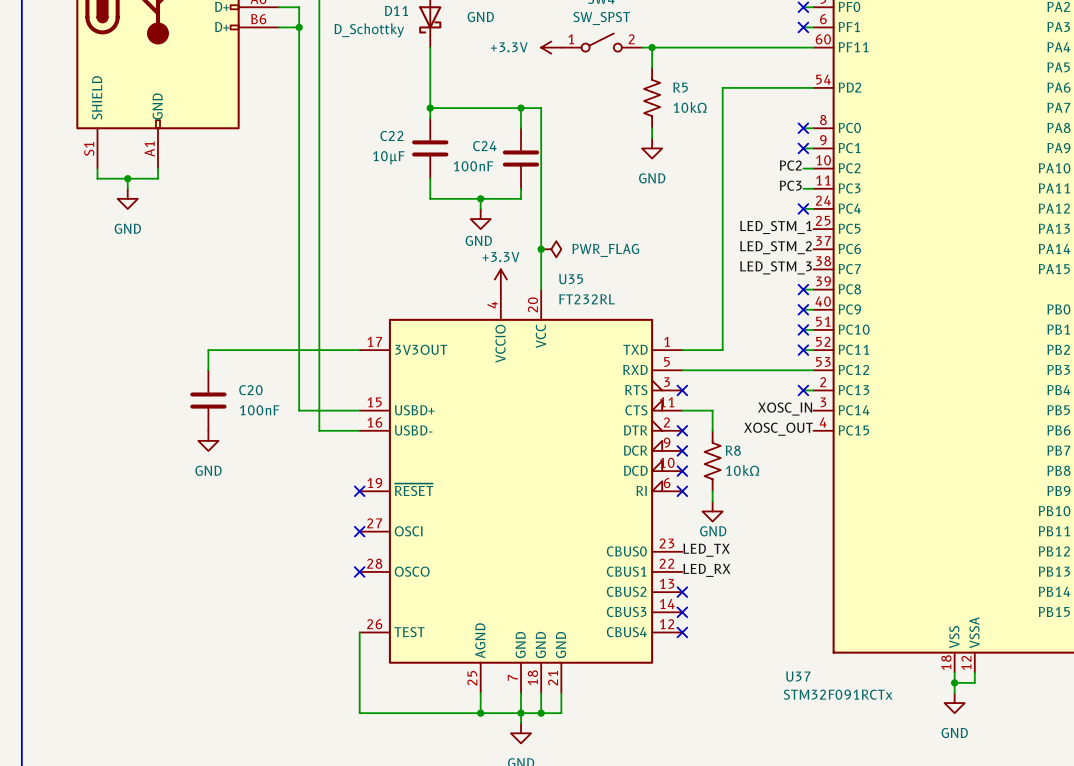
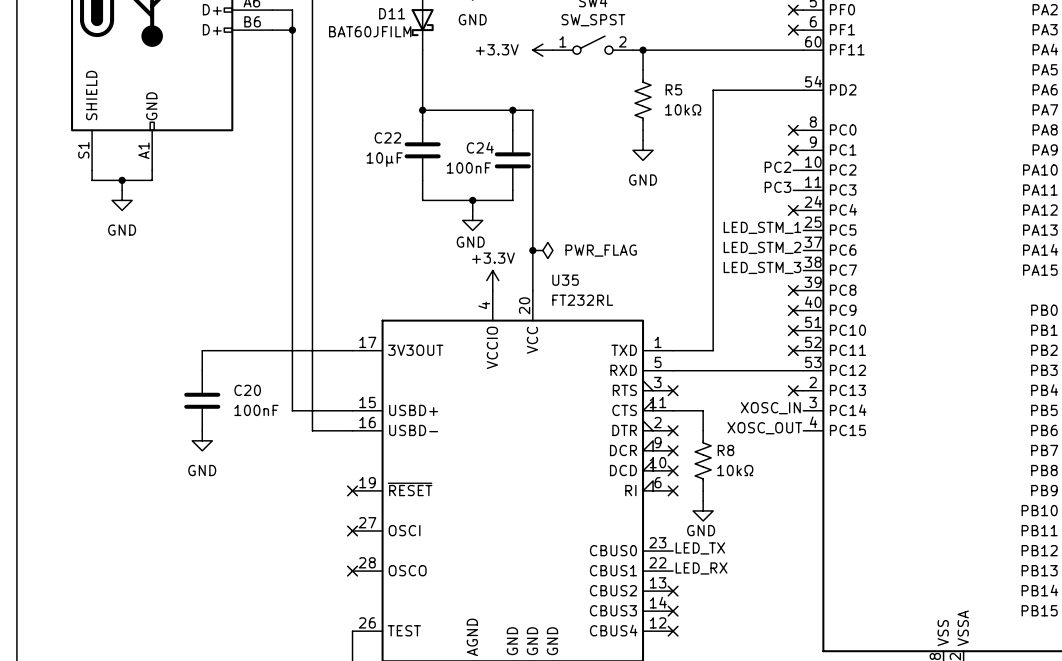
D11 value: D_Schottky (369, 30) -> BAT60JFILM (370, 31)

